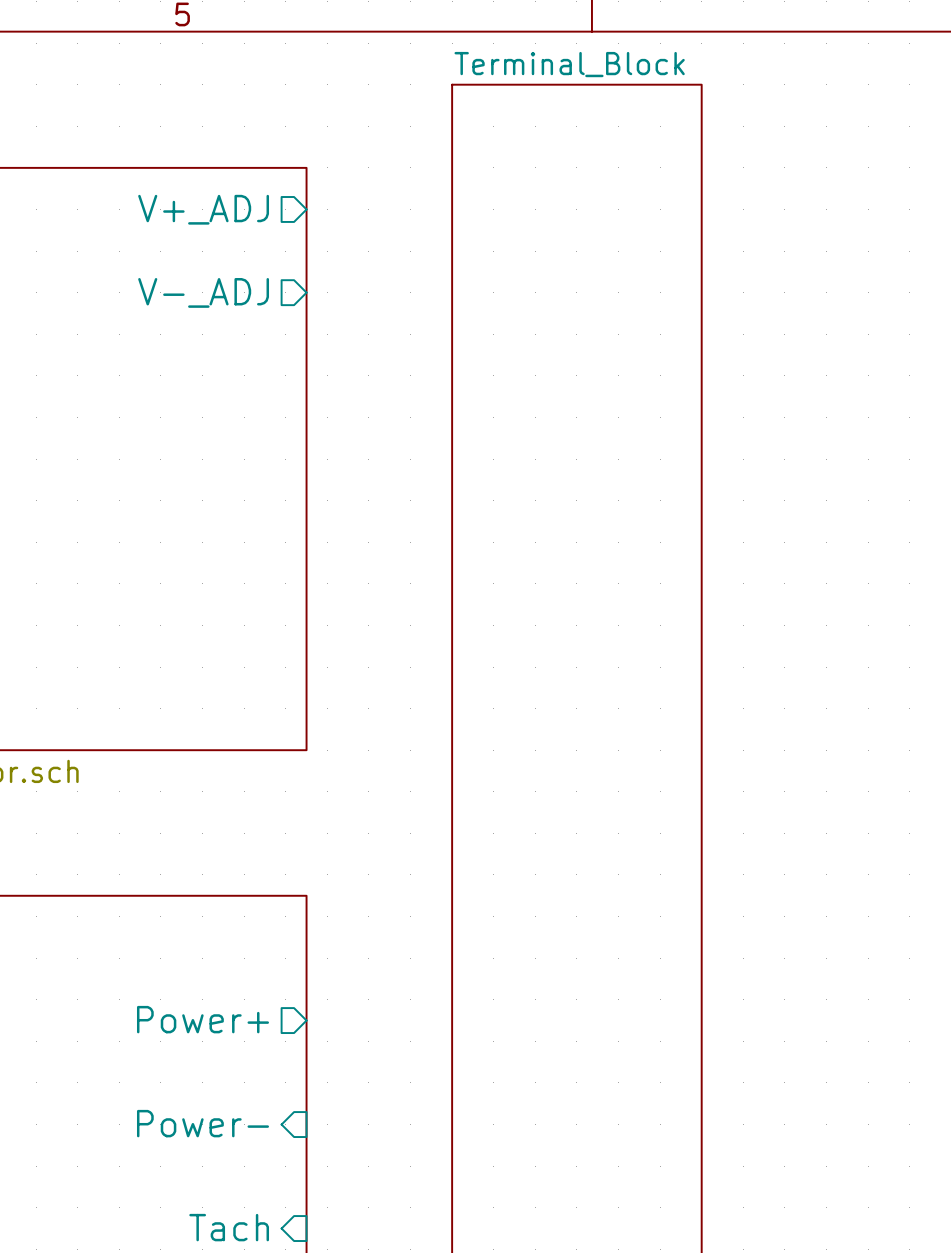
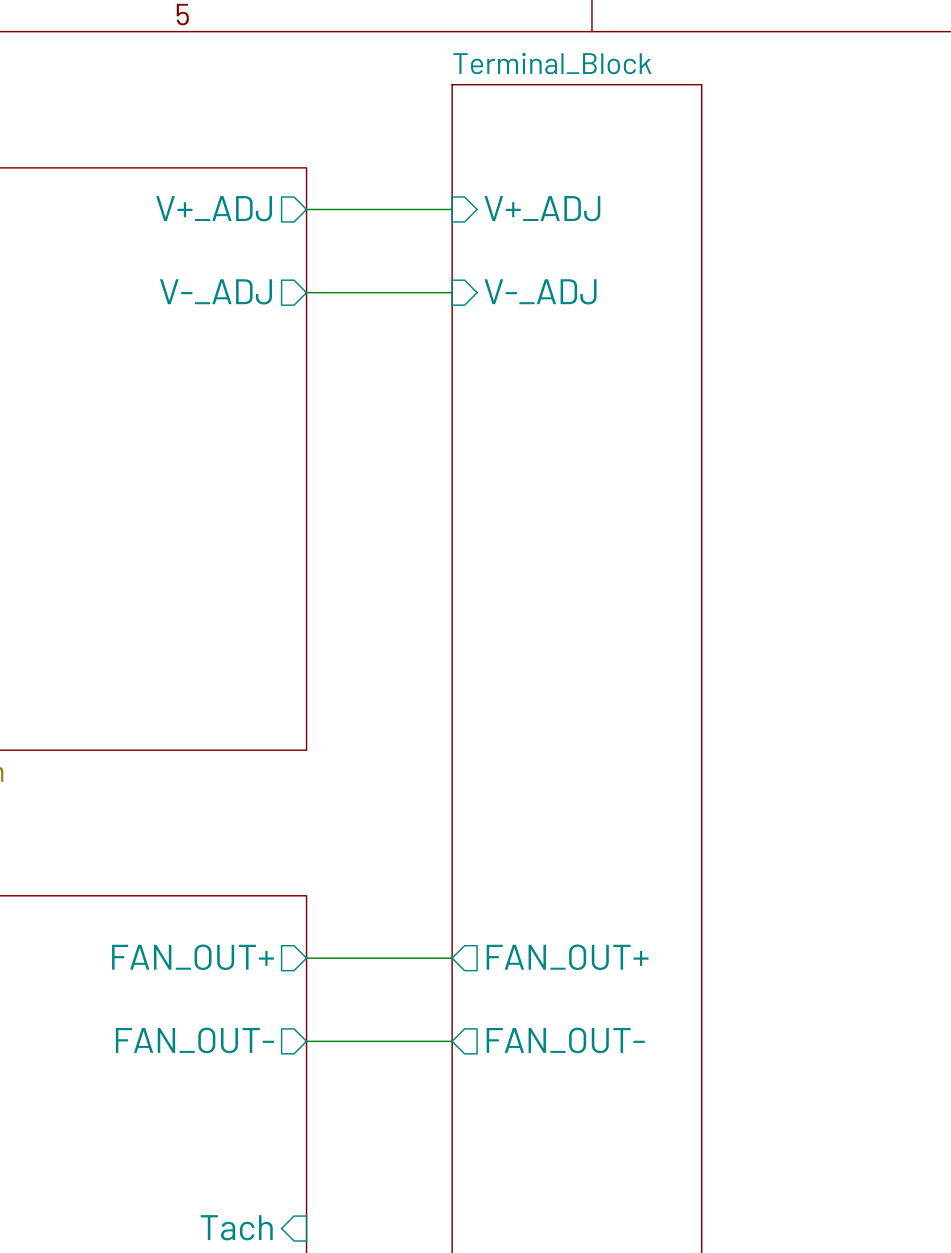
wire: none -> (306, 209) (452, 209)
sheet pin: none -> V+_ADJ (542, 208)
wire: none -> (306, 292) (452, 292)
sheet pin: none -> V-_ADJ (540, 291)
sheet pin: none -> FAN_OUT+ (193, 957)
wire: none -> (306, 958) (452, 958)
sheet pin: none -> FAN_OUT+ (567, 957)
sheet pin: Power+ (203, 1019) -> none
sheet pin: none -> FAN_OUT- (194, 1040)
wire: none -> (306, 1041) (452, 1041)
sheet pin: none -> FAN_OUT- (565, 1040)
sheet pin: Power- (203, 1123) -> none

